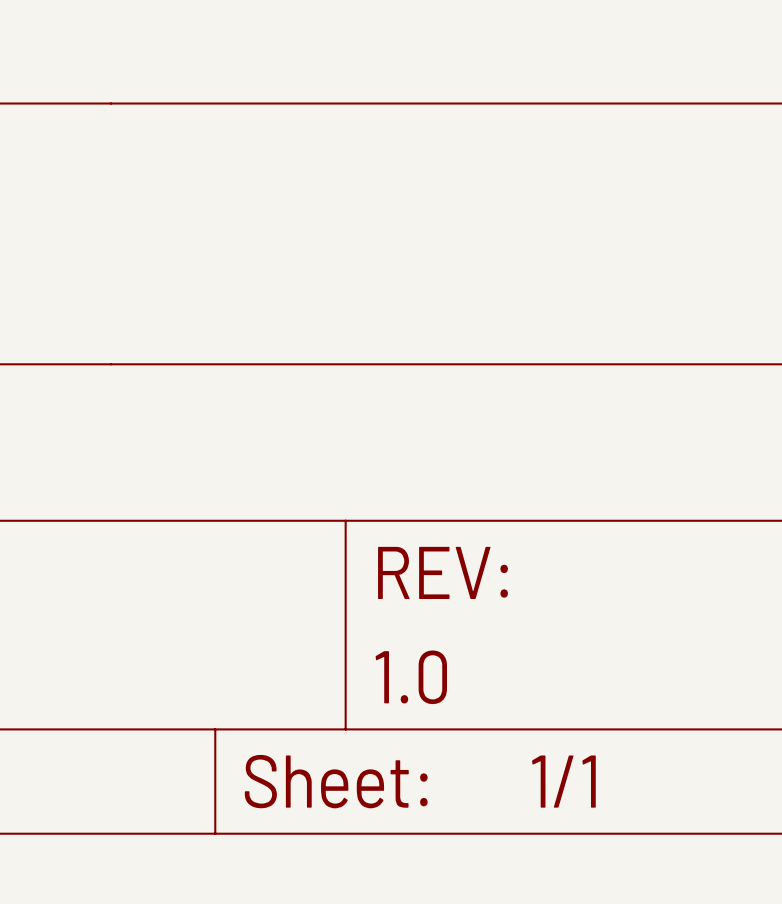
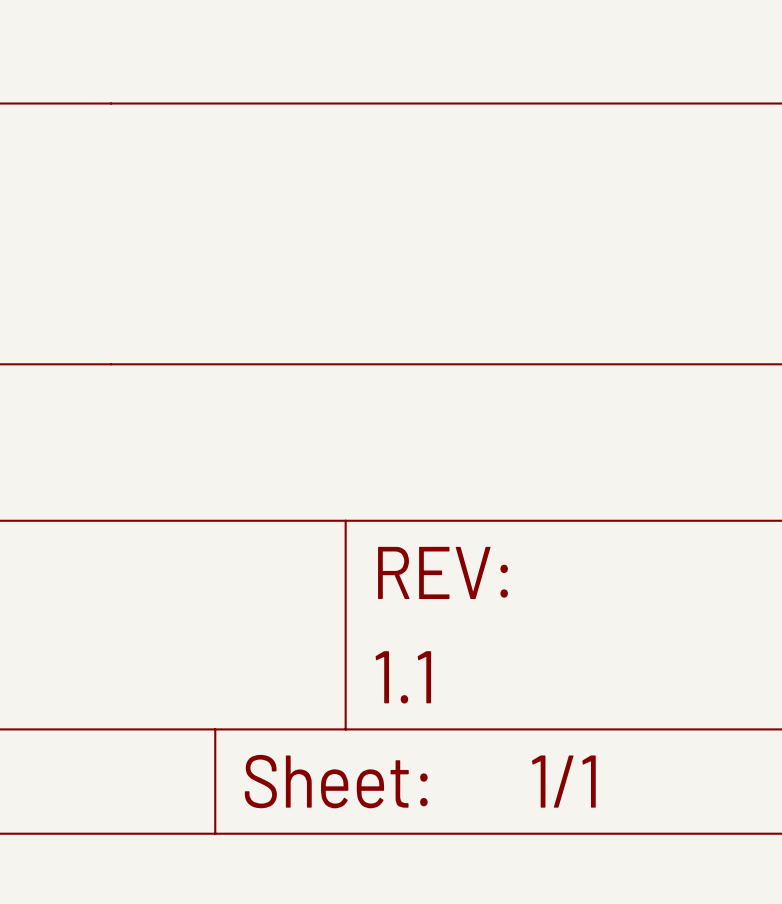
part text: 1.0 (411, 677) -> 1.1 (403, 677)

